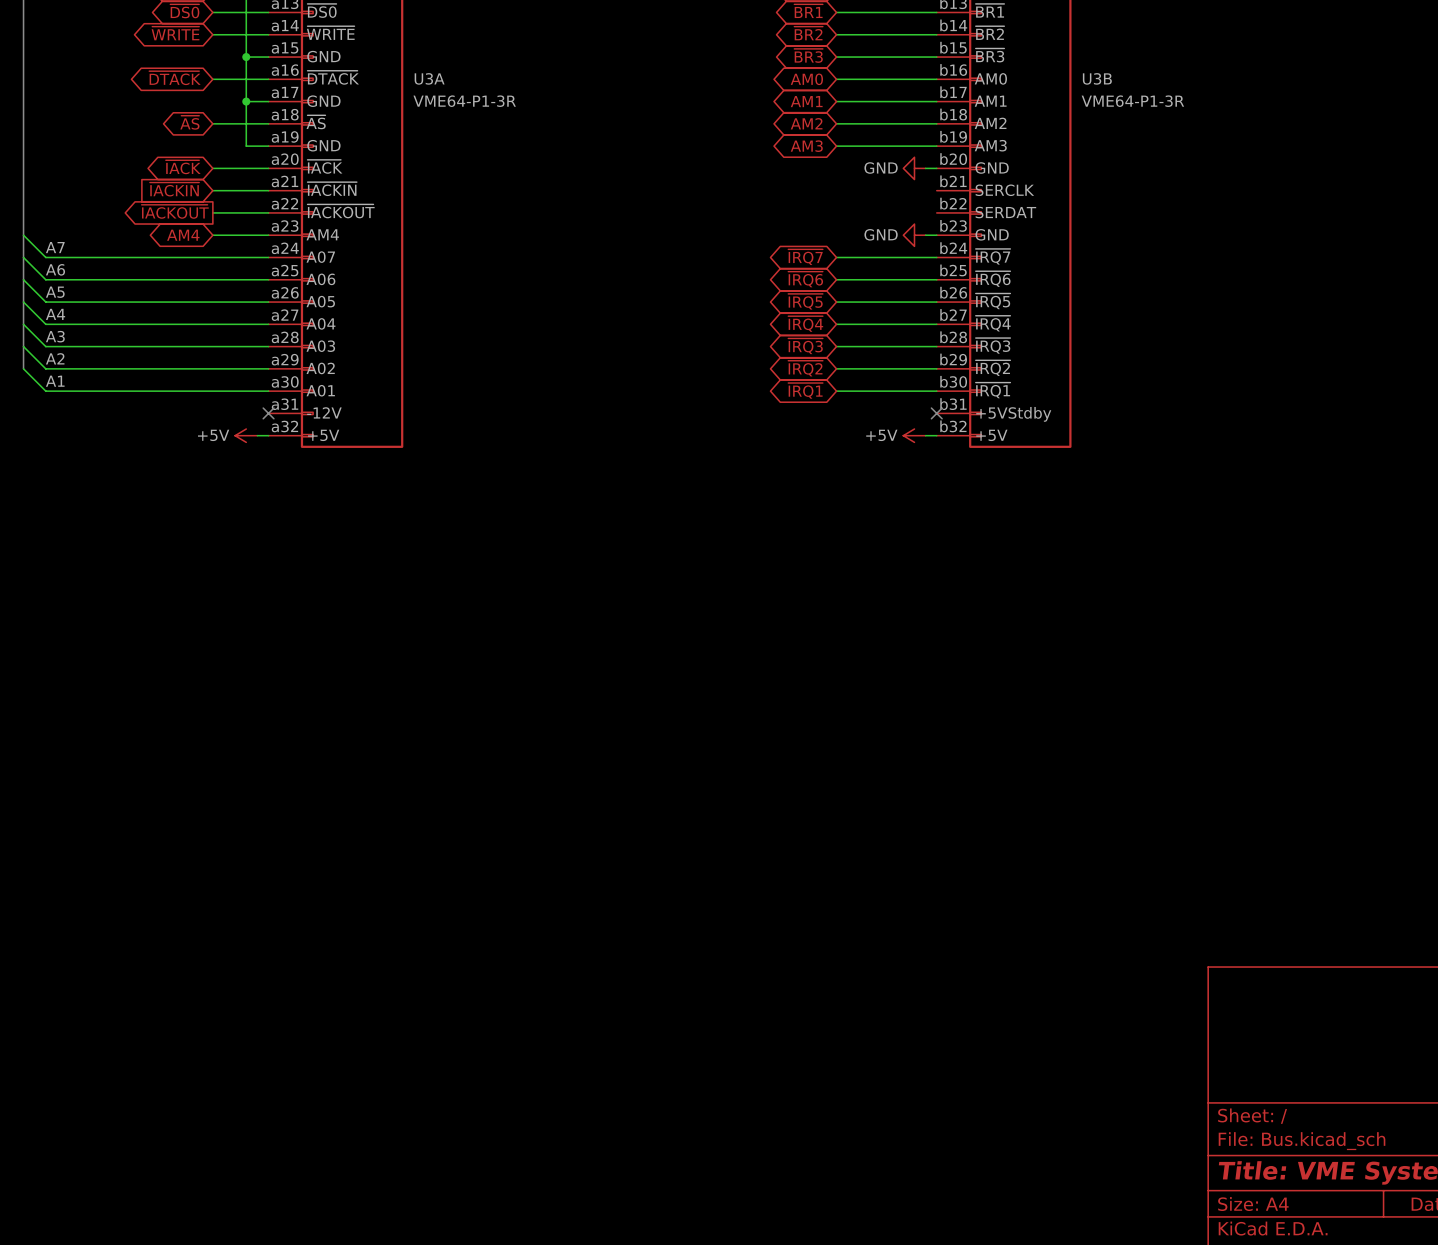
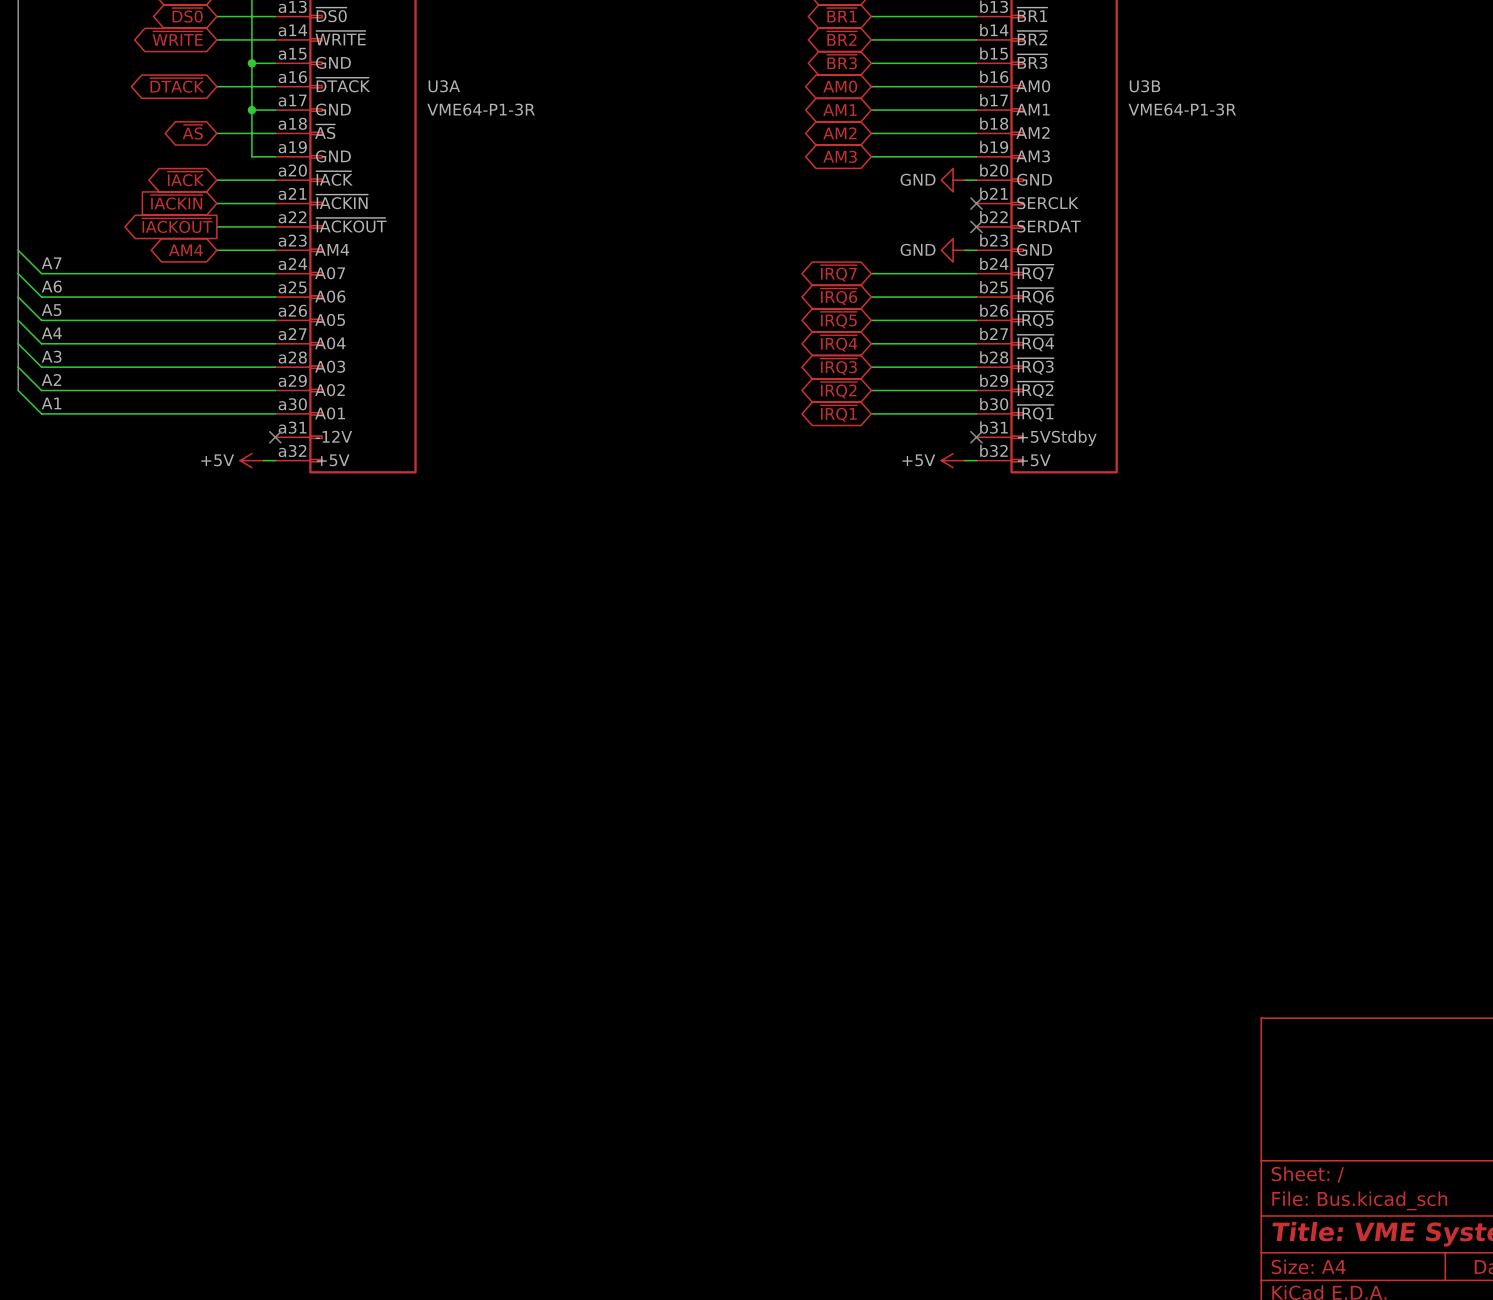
no-connect mark: none -> (976, 203)
no-connect mark: none -> (976, 226)

